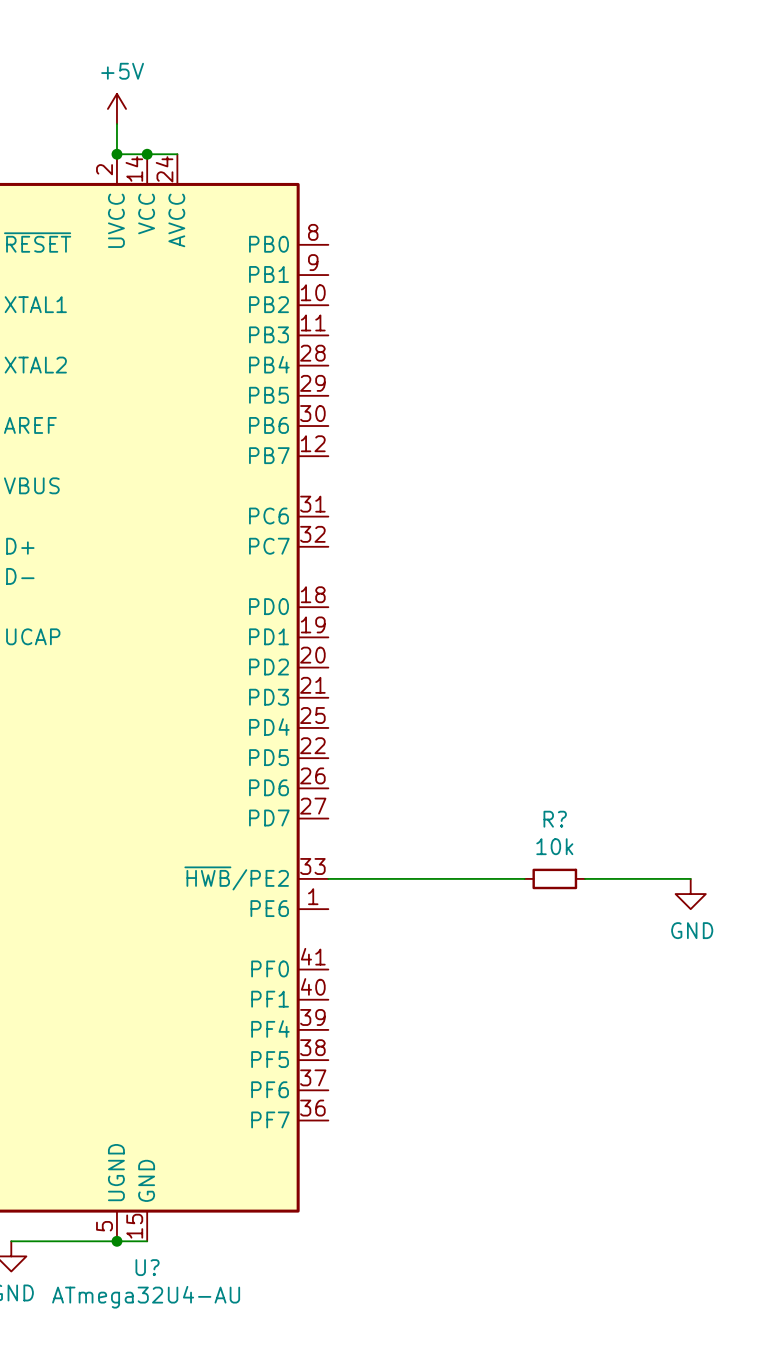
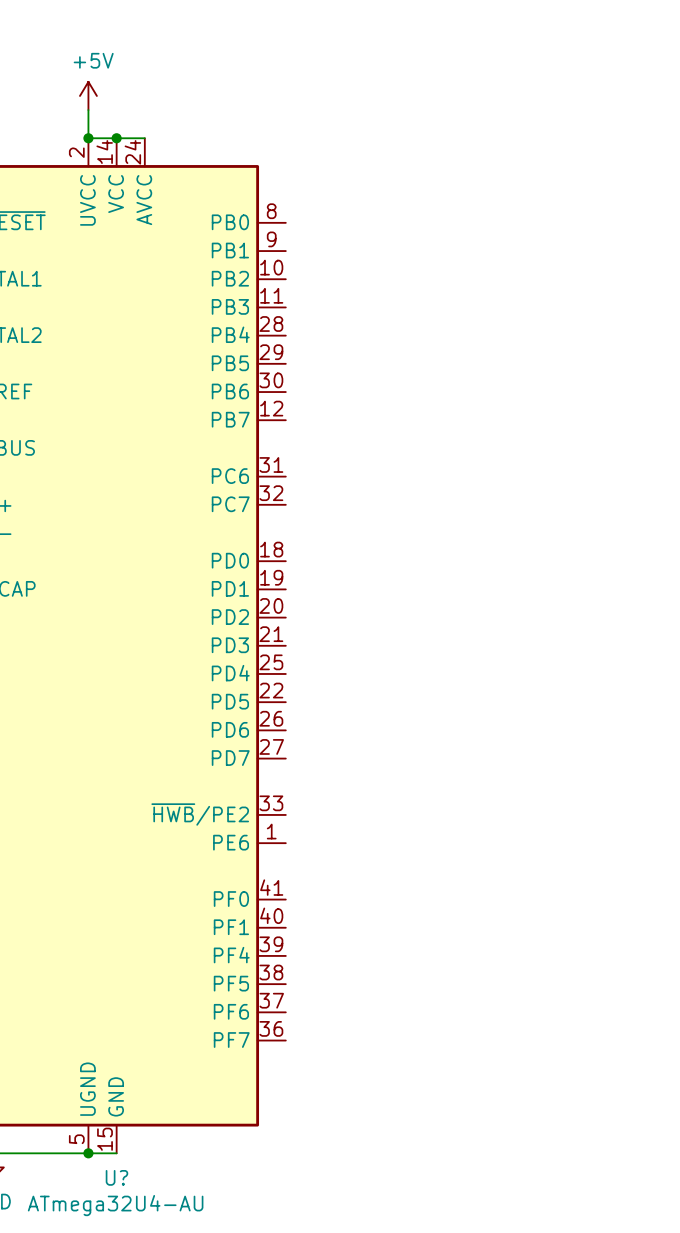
wire: (328, 878) (524, 878) -> none
R?: 10k (554, 878) -> none
wire: (585, 878) (690, 878) -> none
power symbol: GND (690, 894) -> none

